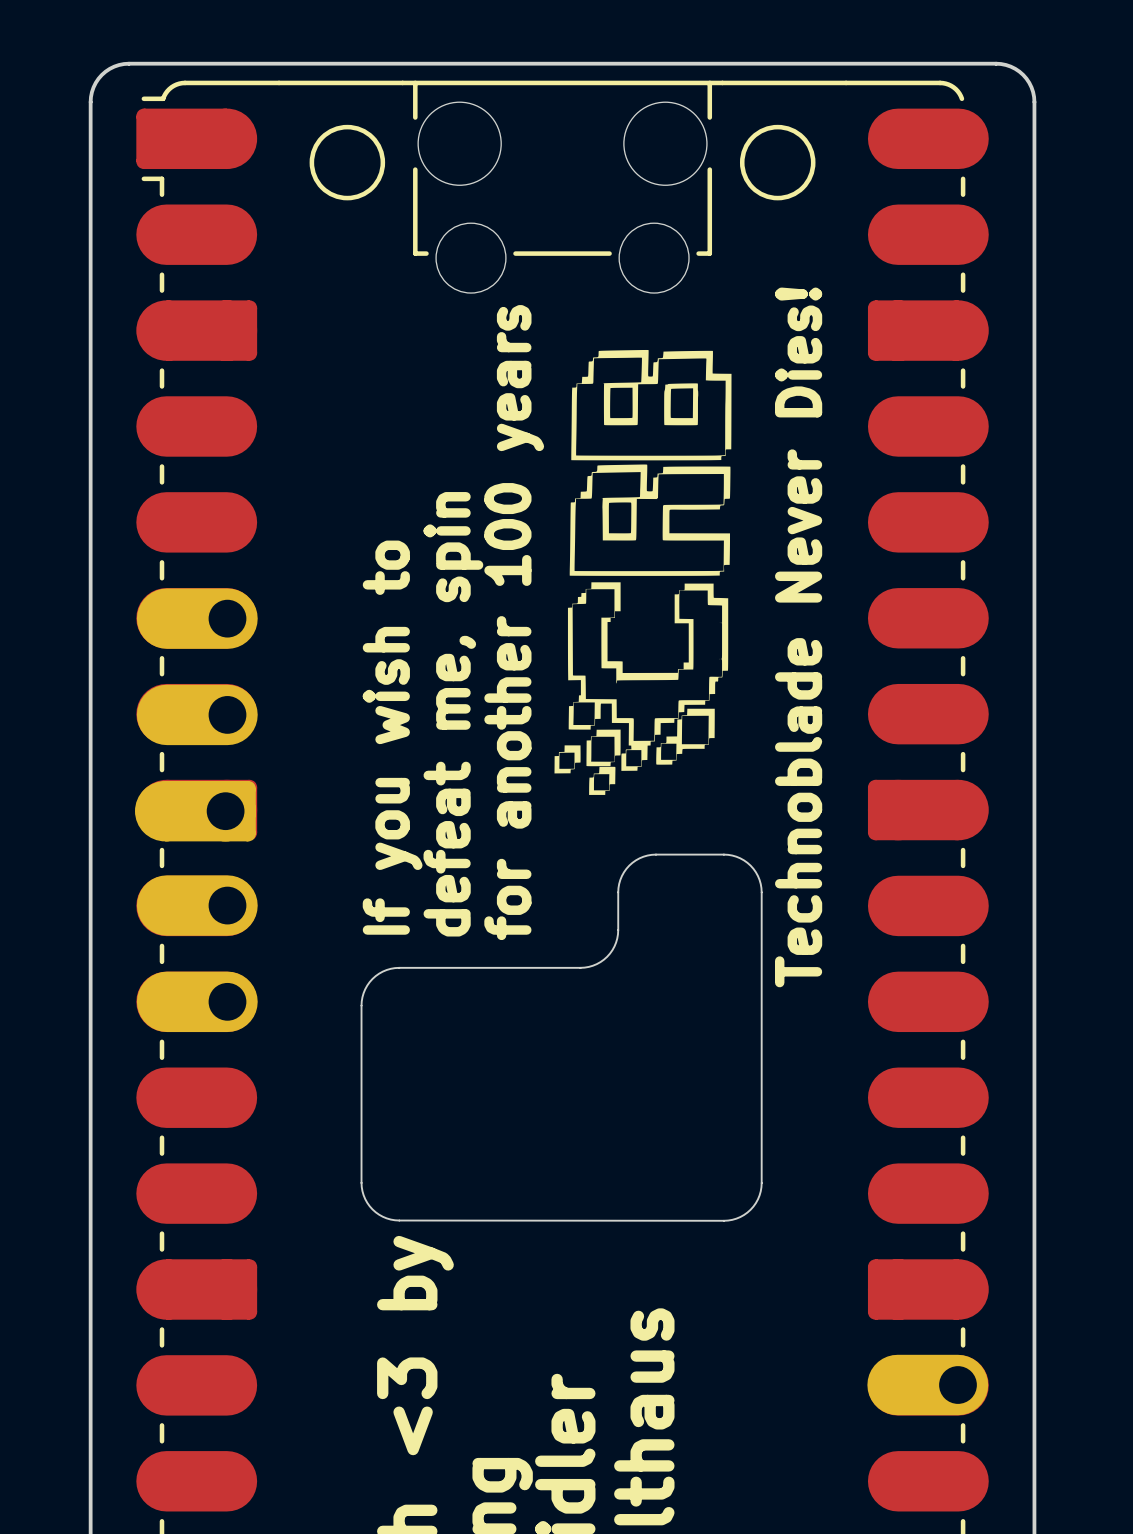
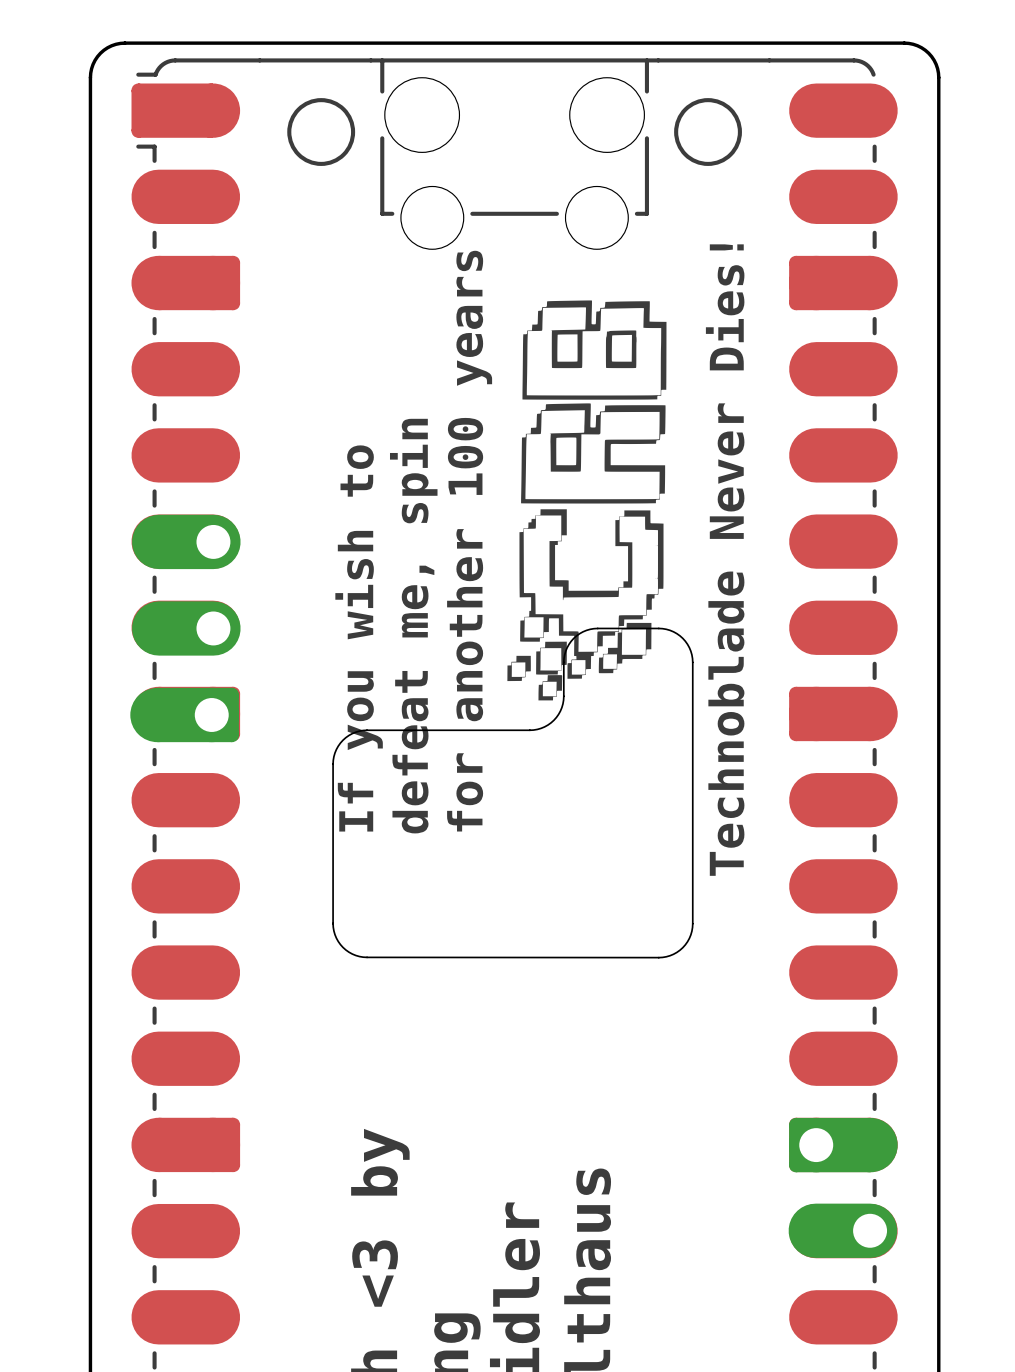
part: (197, 905) -> none
part: (197, 1001) -> none
part position: (561, 1037) -> (512, 793)
part: none -> (843, 1145)

